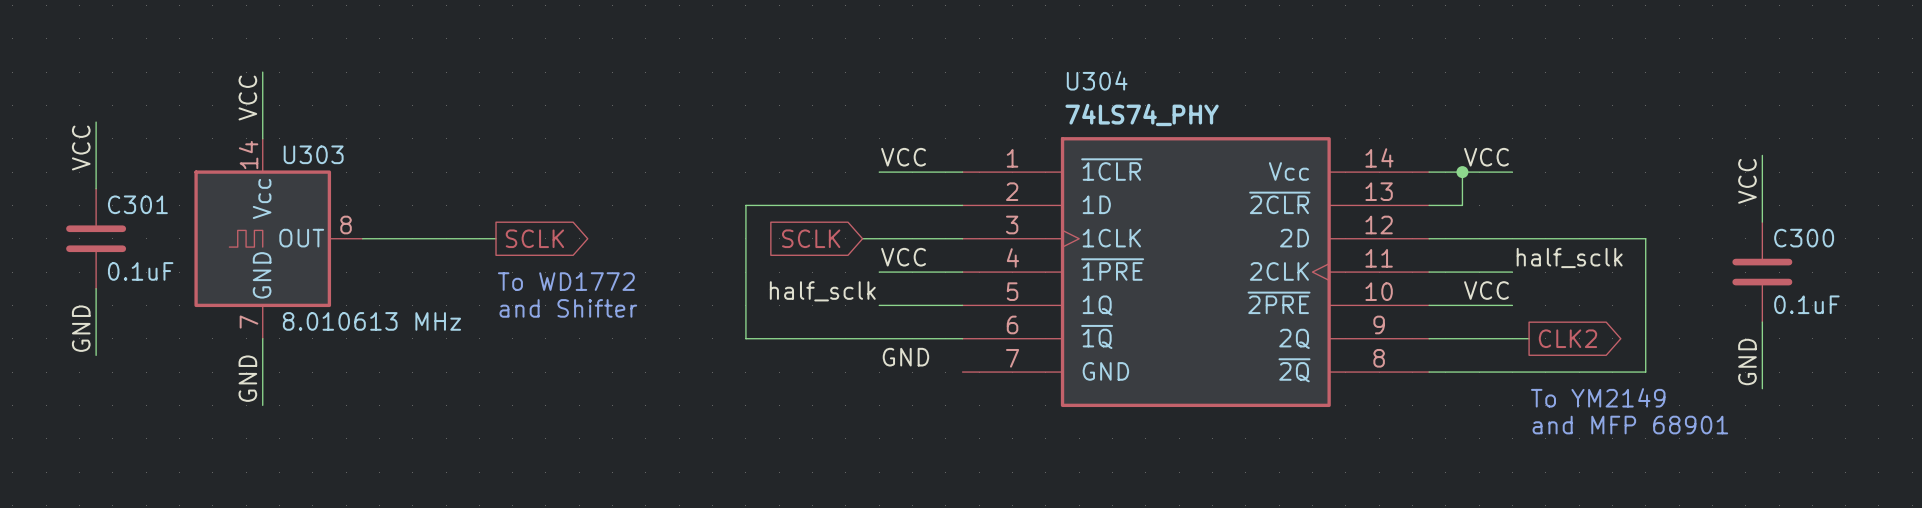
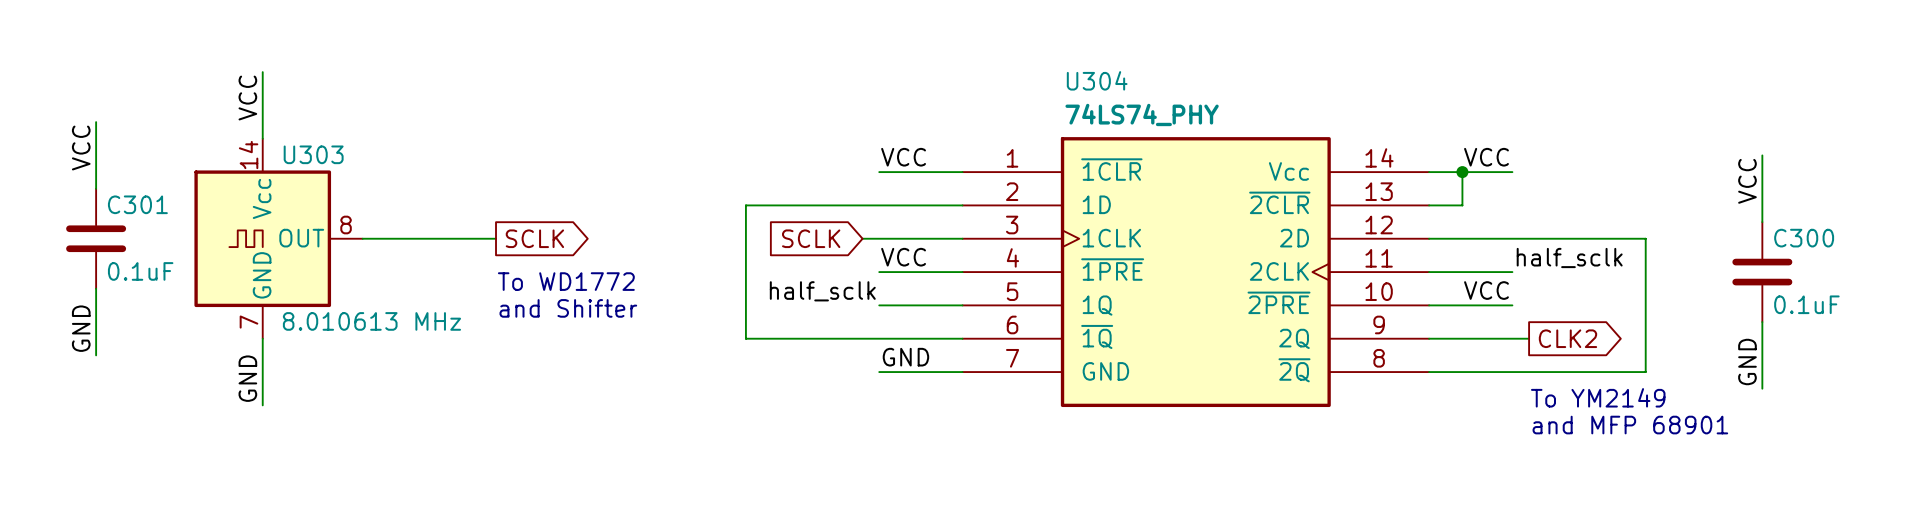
wire: none -> (879, 372) (962, 372)

